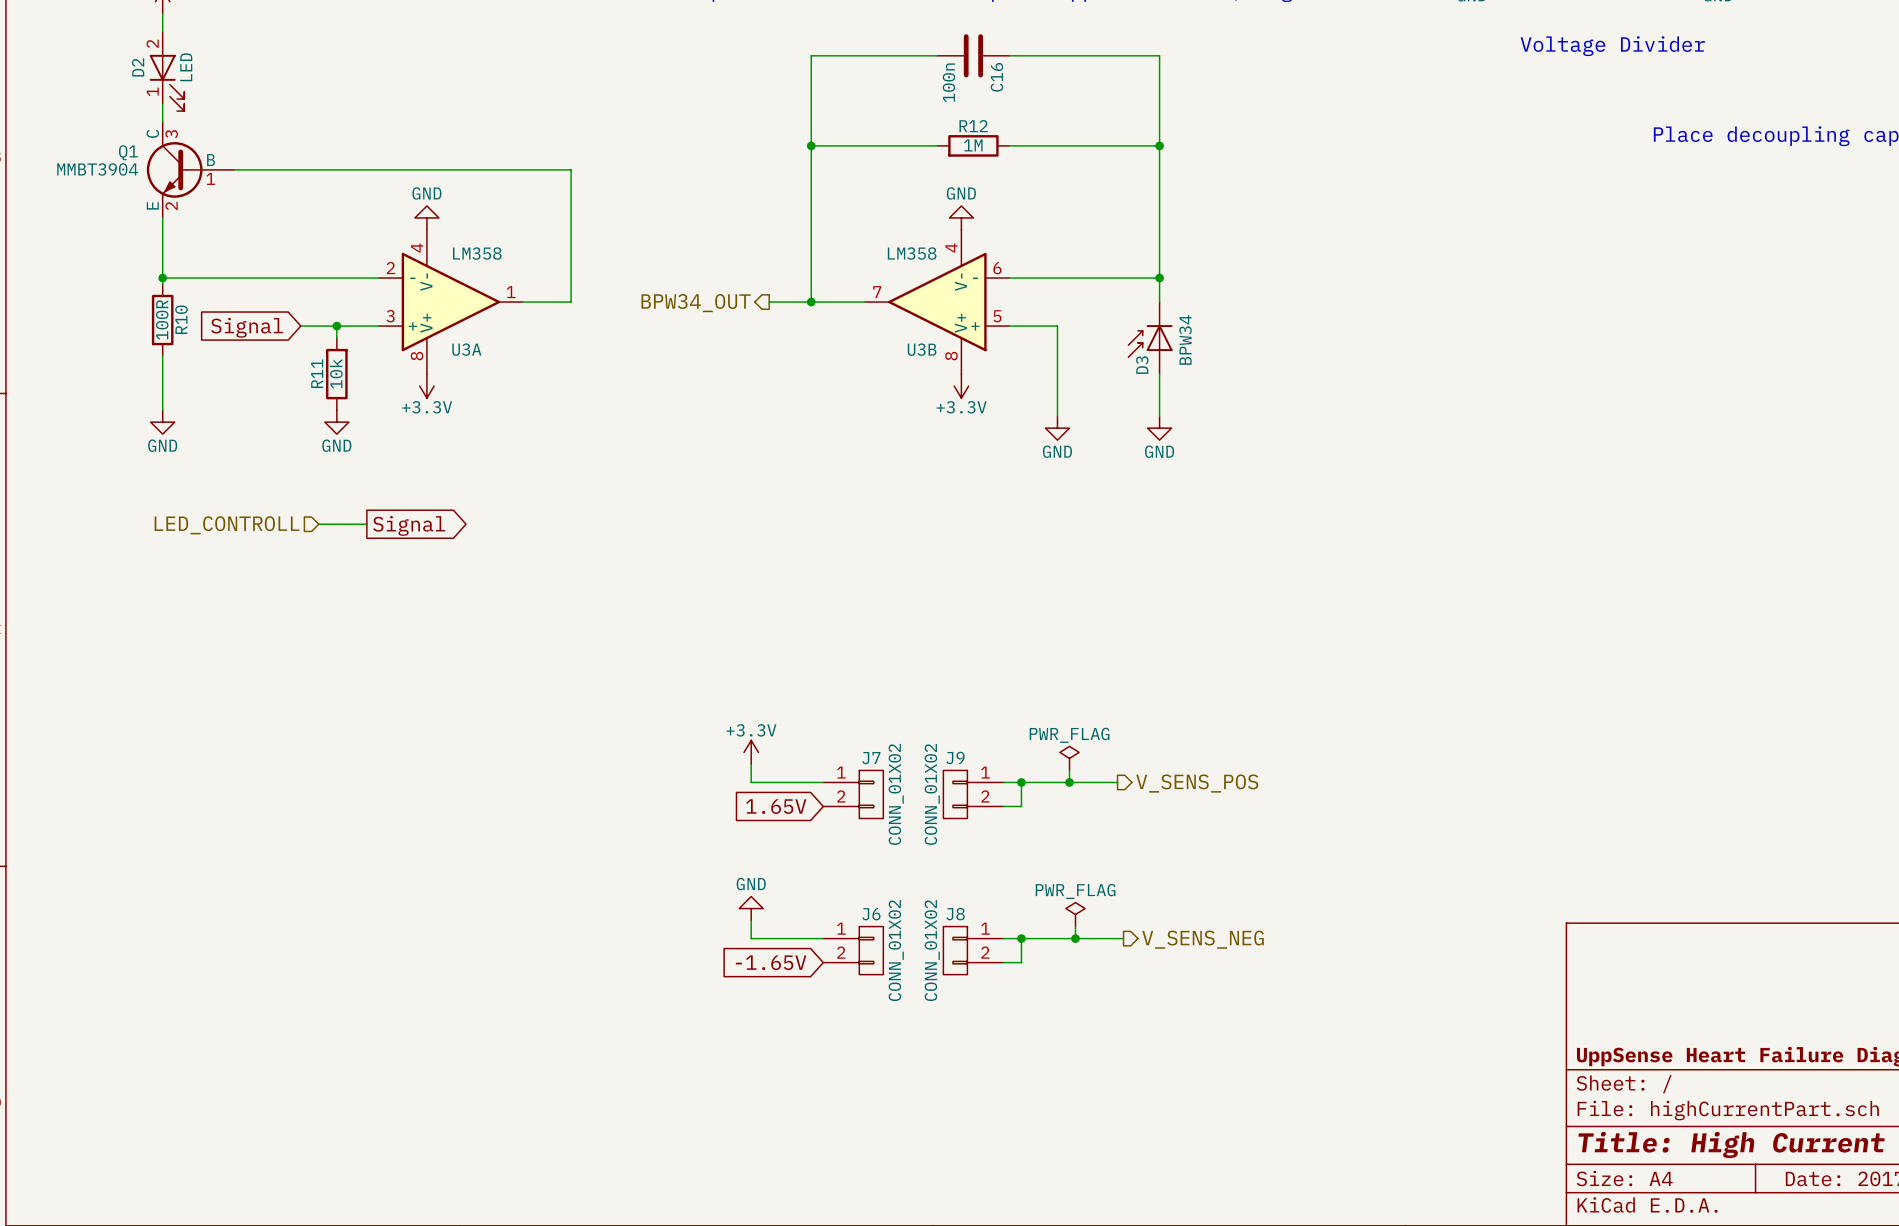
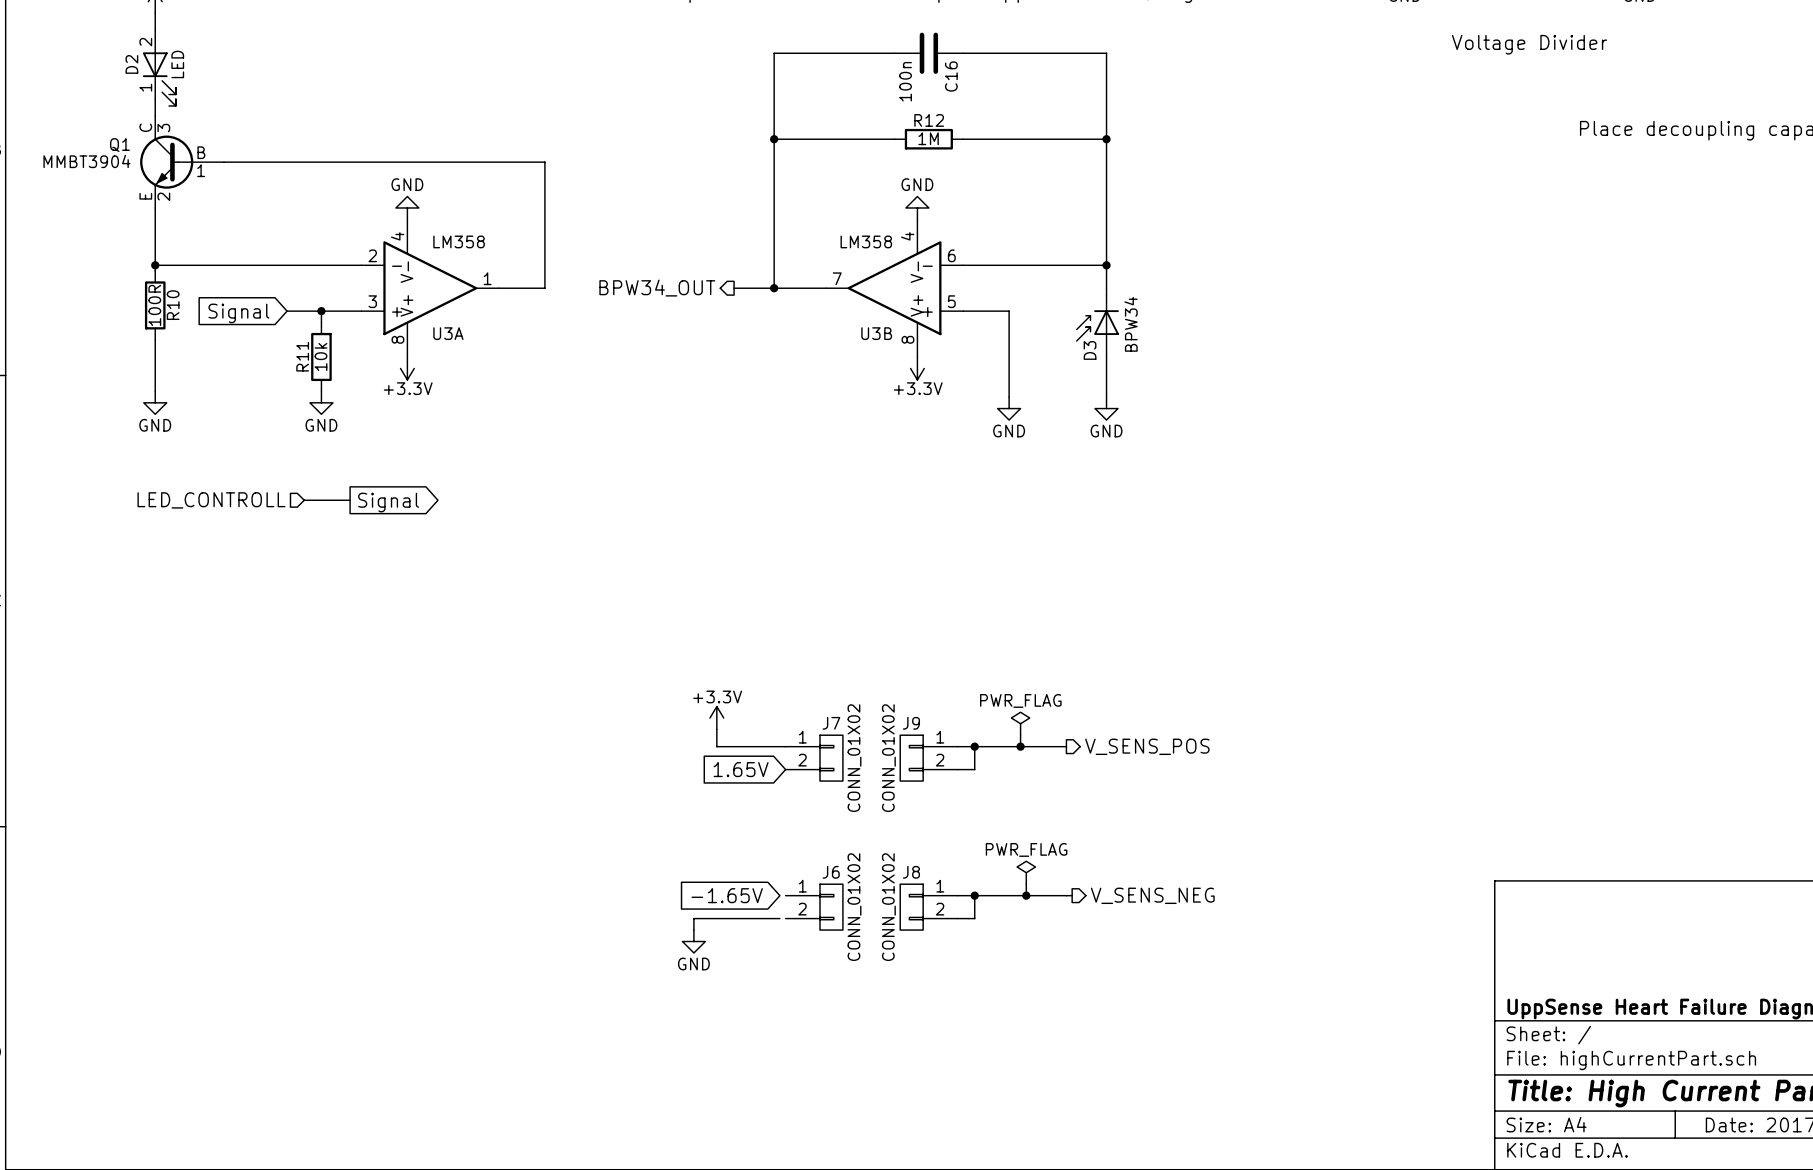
power symbol rotation: 0° (751, 908) -> 180° (693, 941)
power symbol position: GND (751, 908) -> GND (693, 941)
wire: (751, 920) (751, 938) (823, 938) -> none
global label position: -1.65V (771, 962) -> -1.65V (727, 895)
wire: none -> (779, 918) (693, 918) (693, 930)

